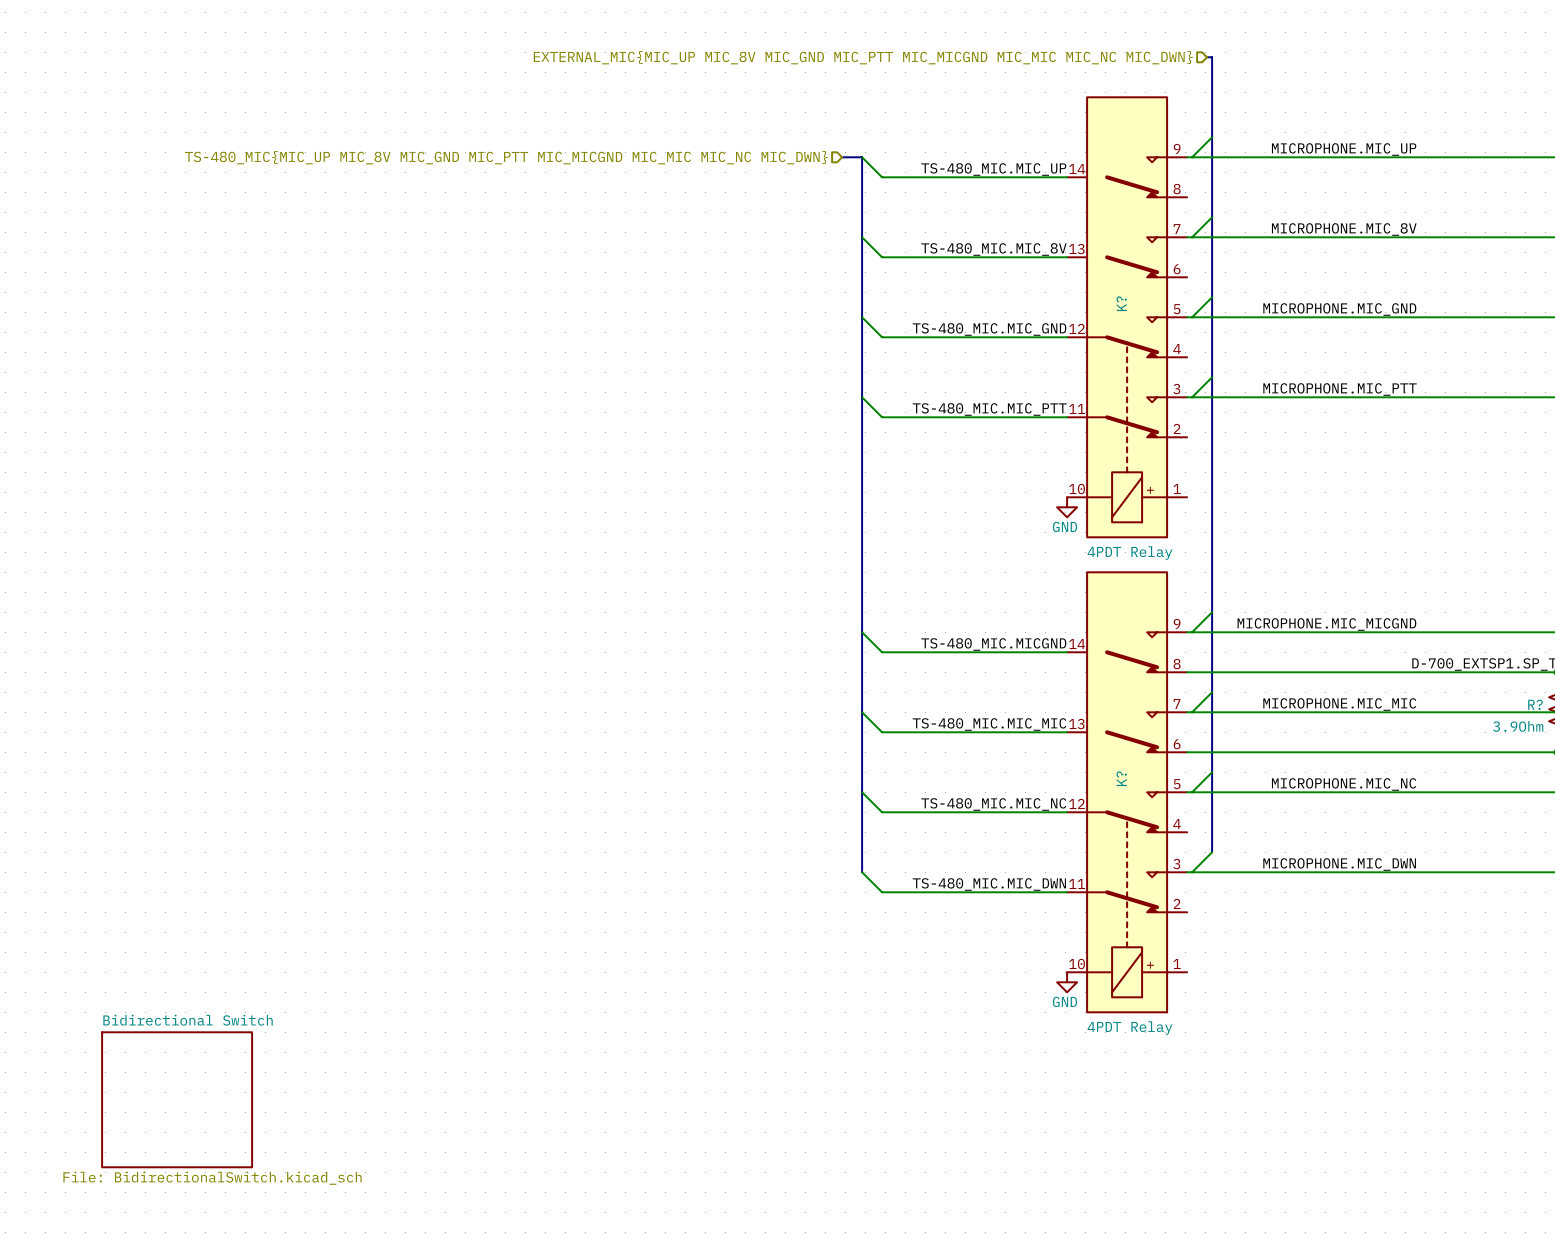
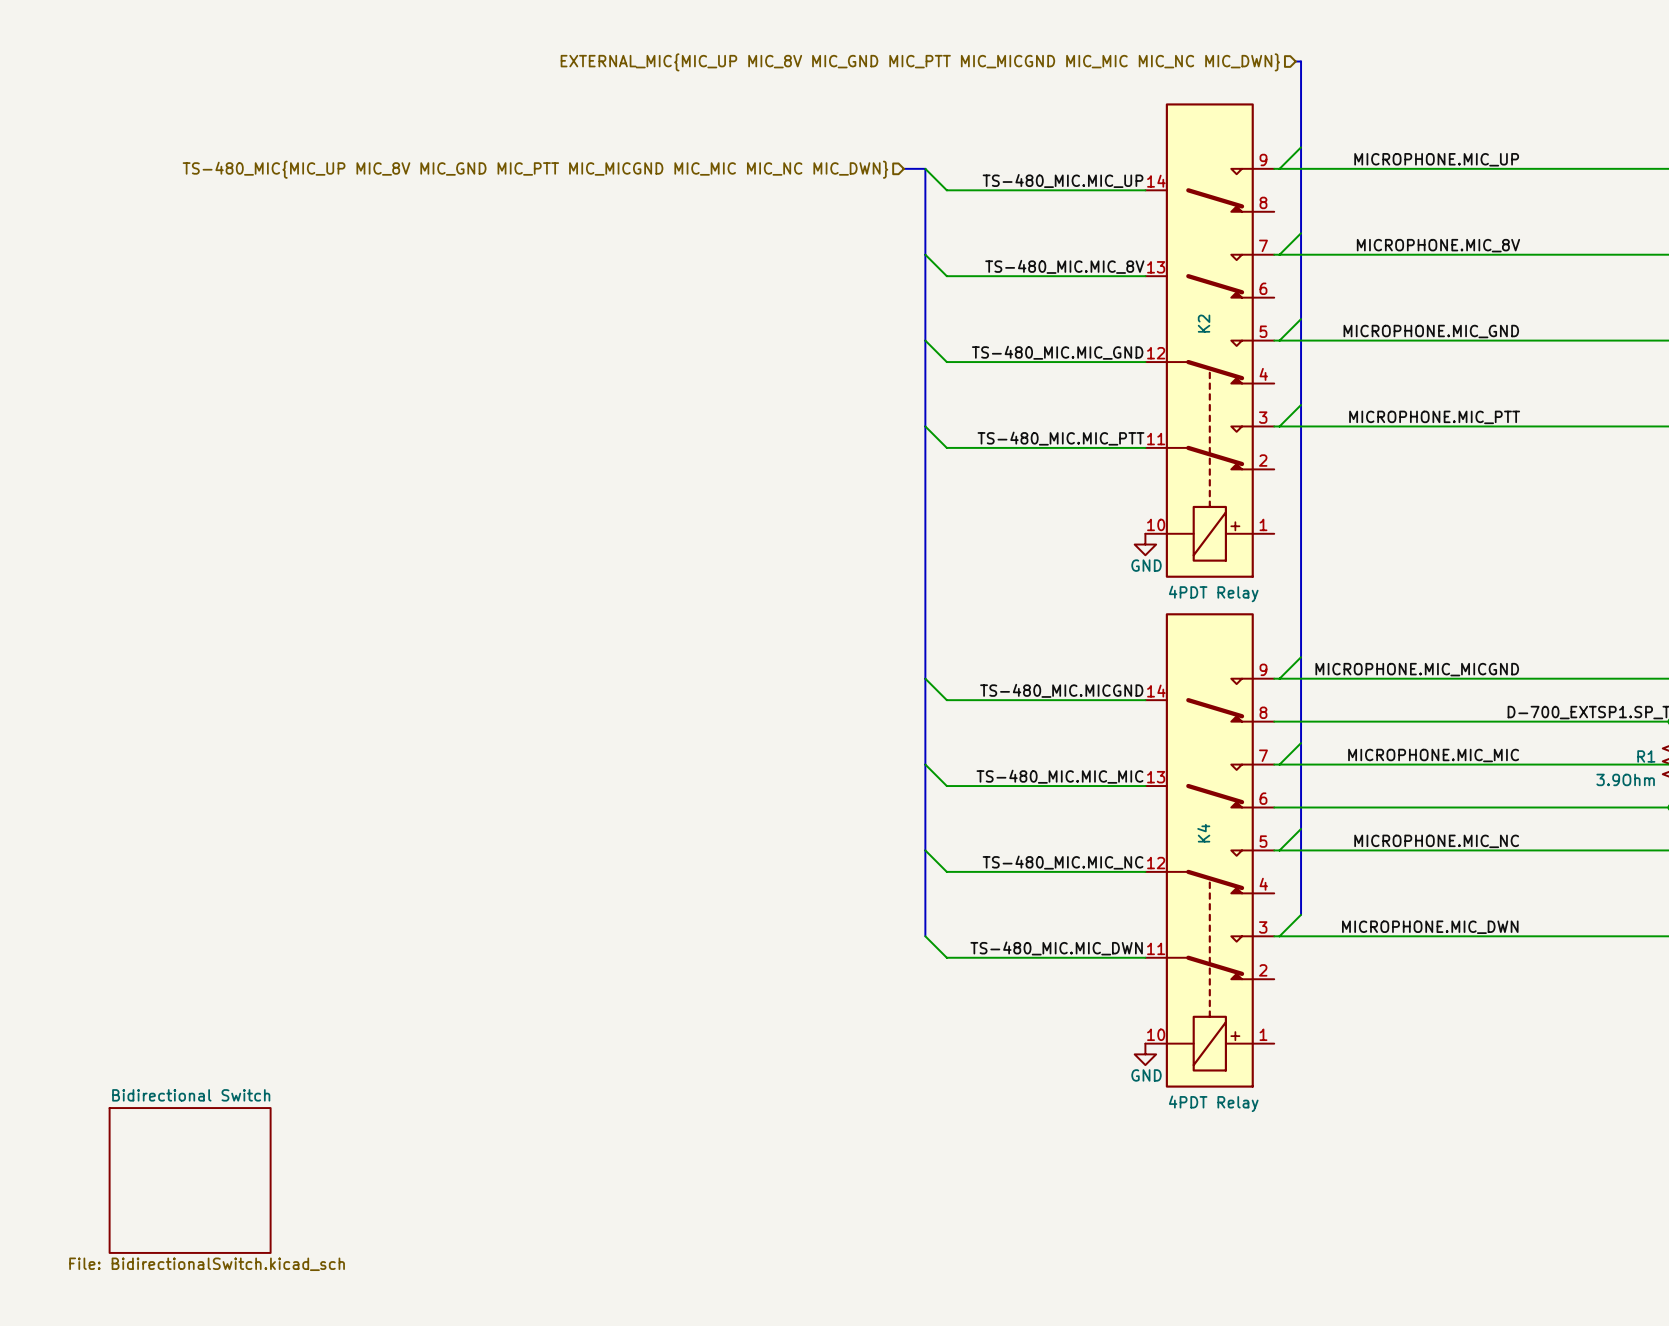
K? name: K? (1121, 303) -> K2 (1204, 323)
R? name: R? (1535, 704) -> R1 (1646, 756)
K? name: K? (1121, 778) -> K4 (1203, 833)

